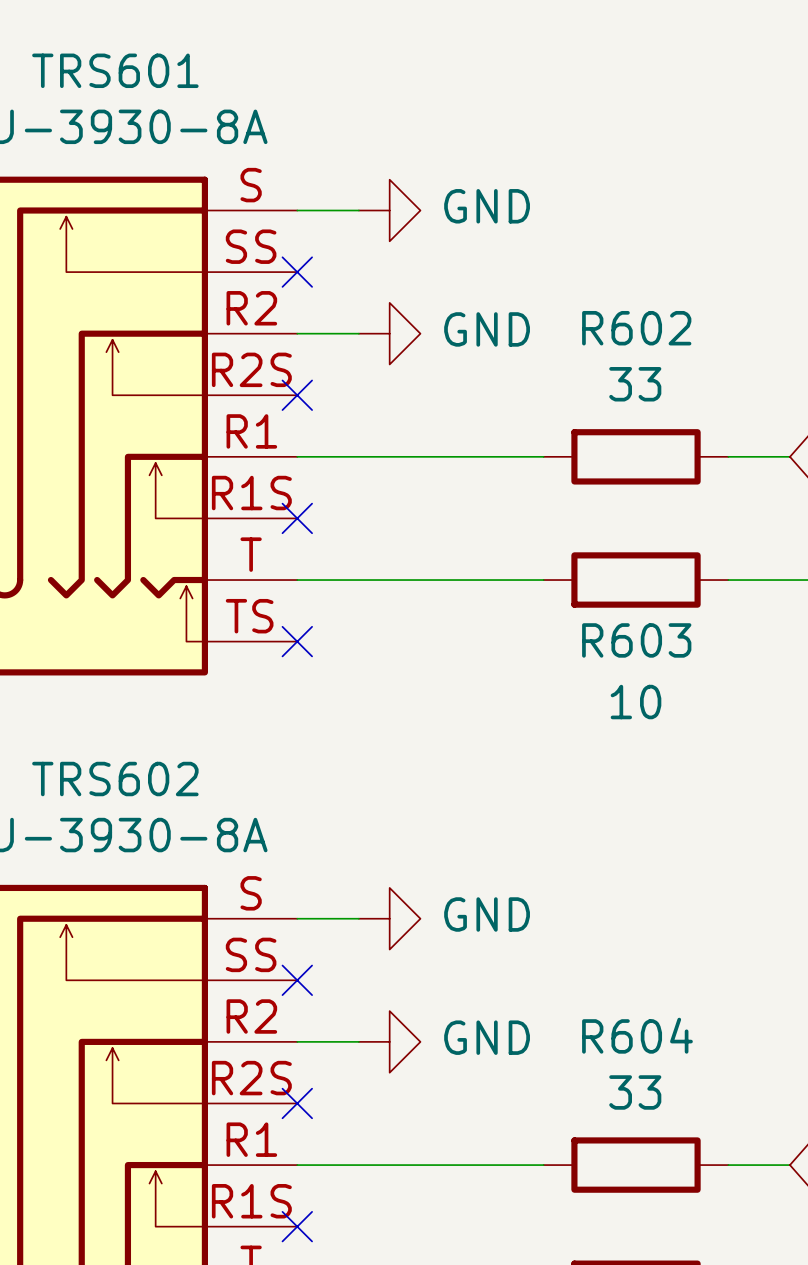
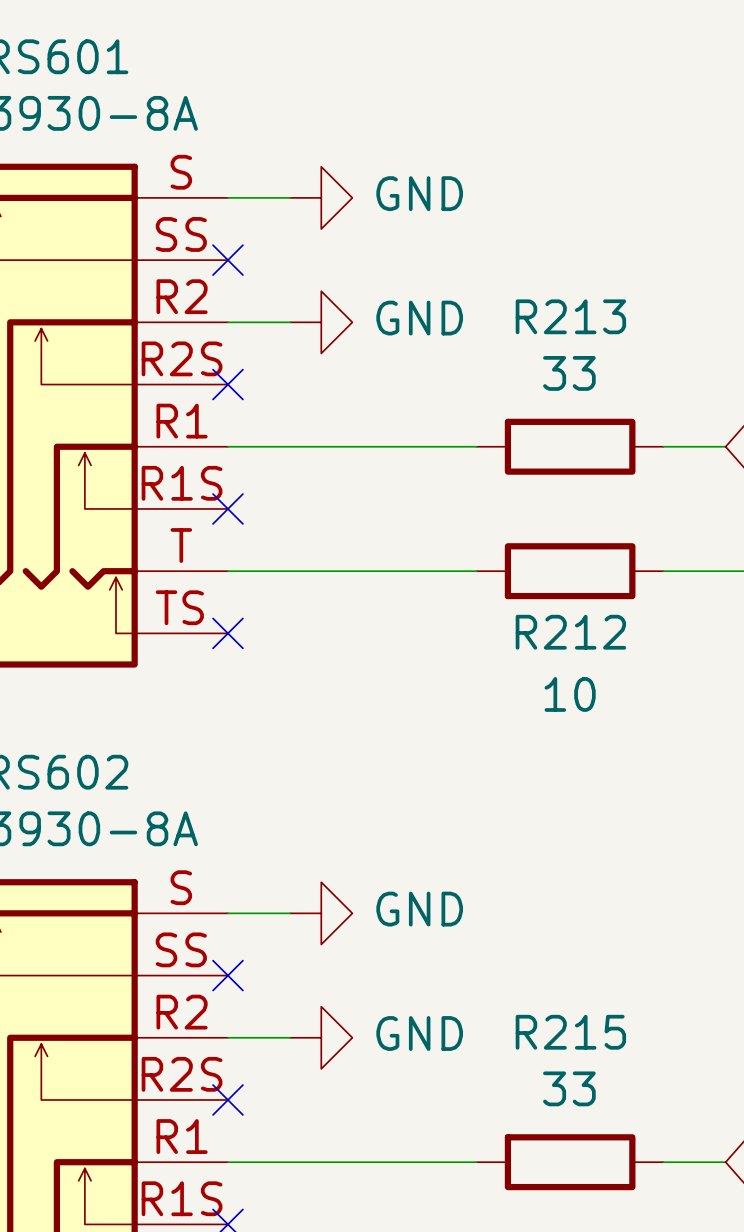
R602 name: R602 (636, 328) -> R213 (570, 316)
R603 name: R603 (636, 640) -> R212 (570, 632)
R604 name: R604 (637, 1035) -> R215 (570, 1032)

